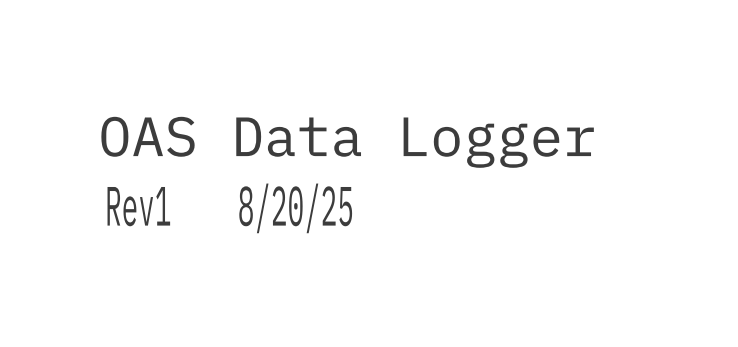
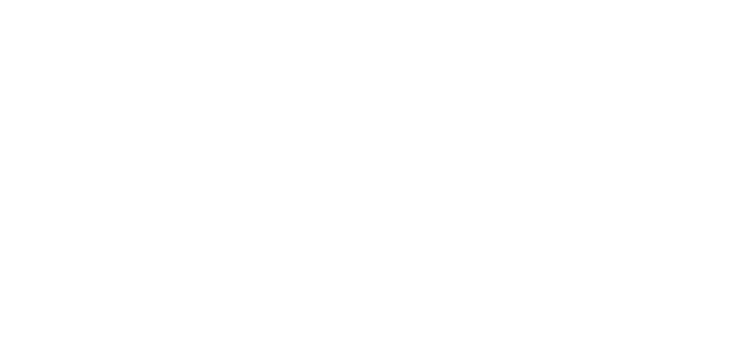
text: OAS Data Logger (347, 142) -> none
text: Rev1 8/20/25 (229, 208) -> none

